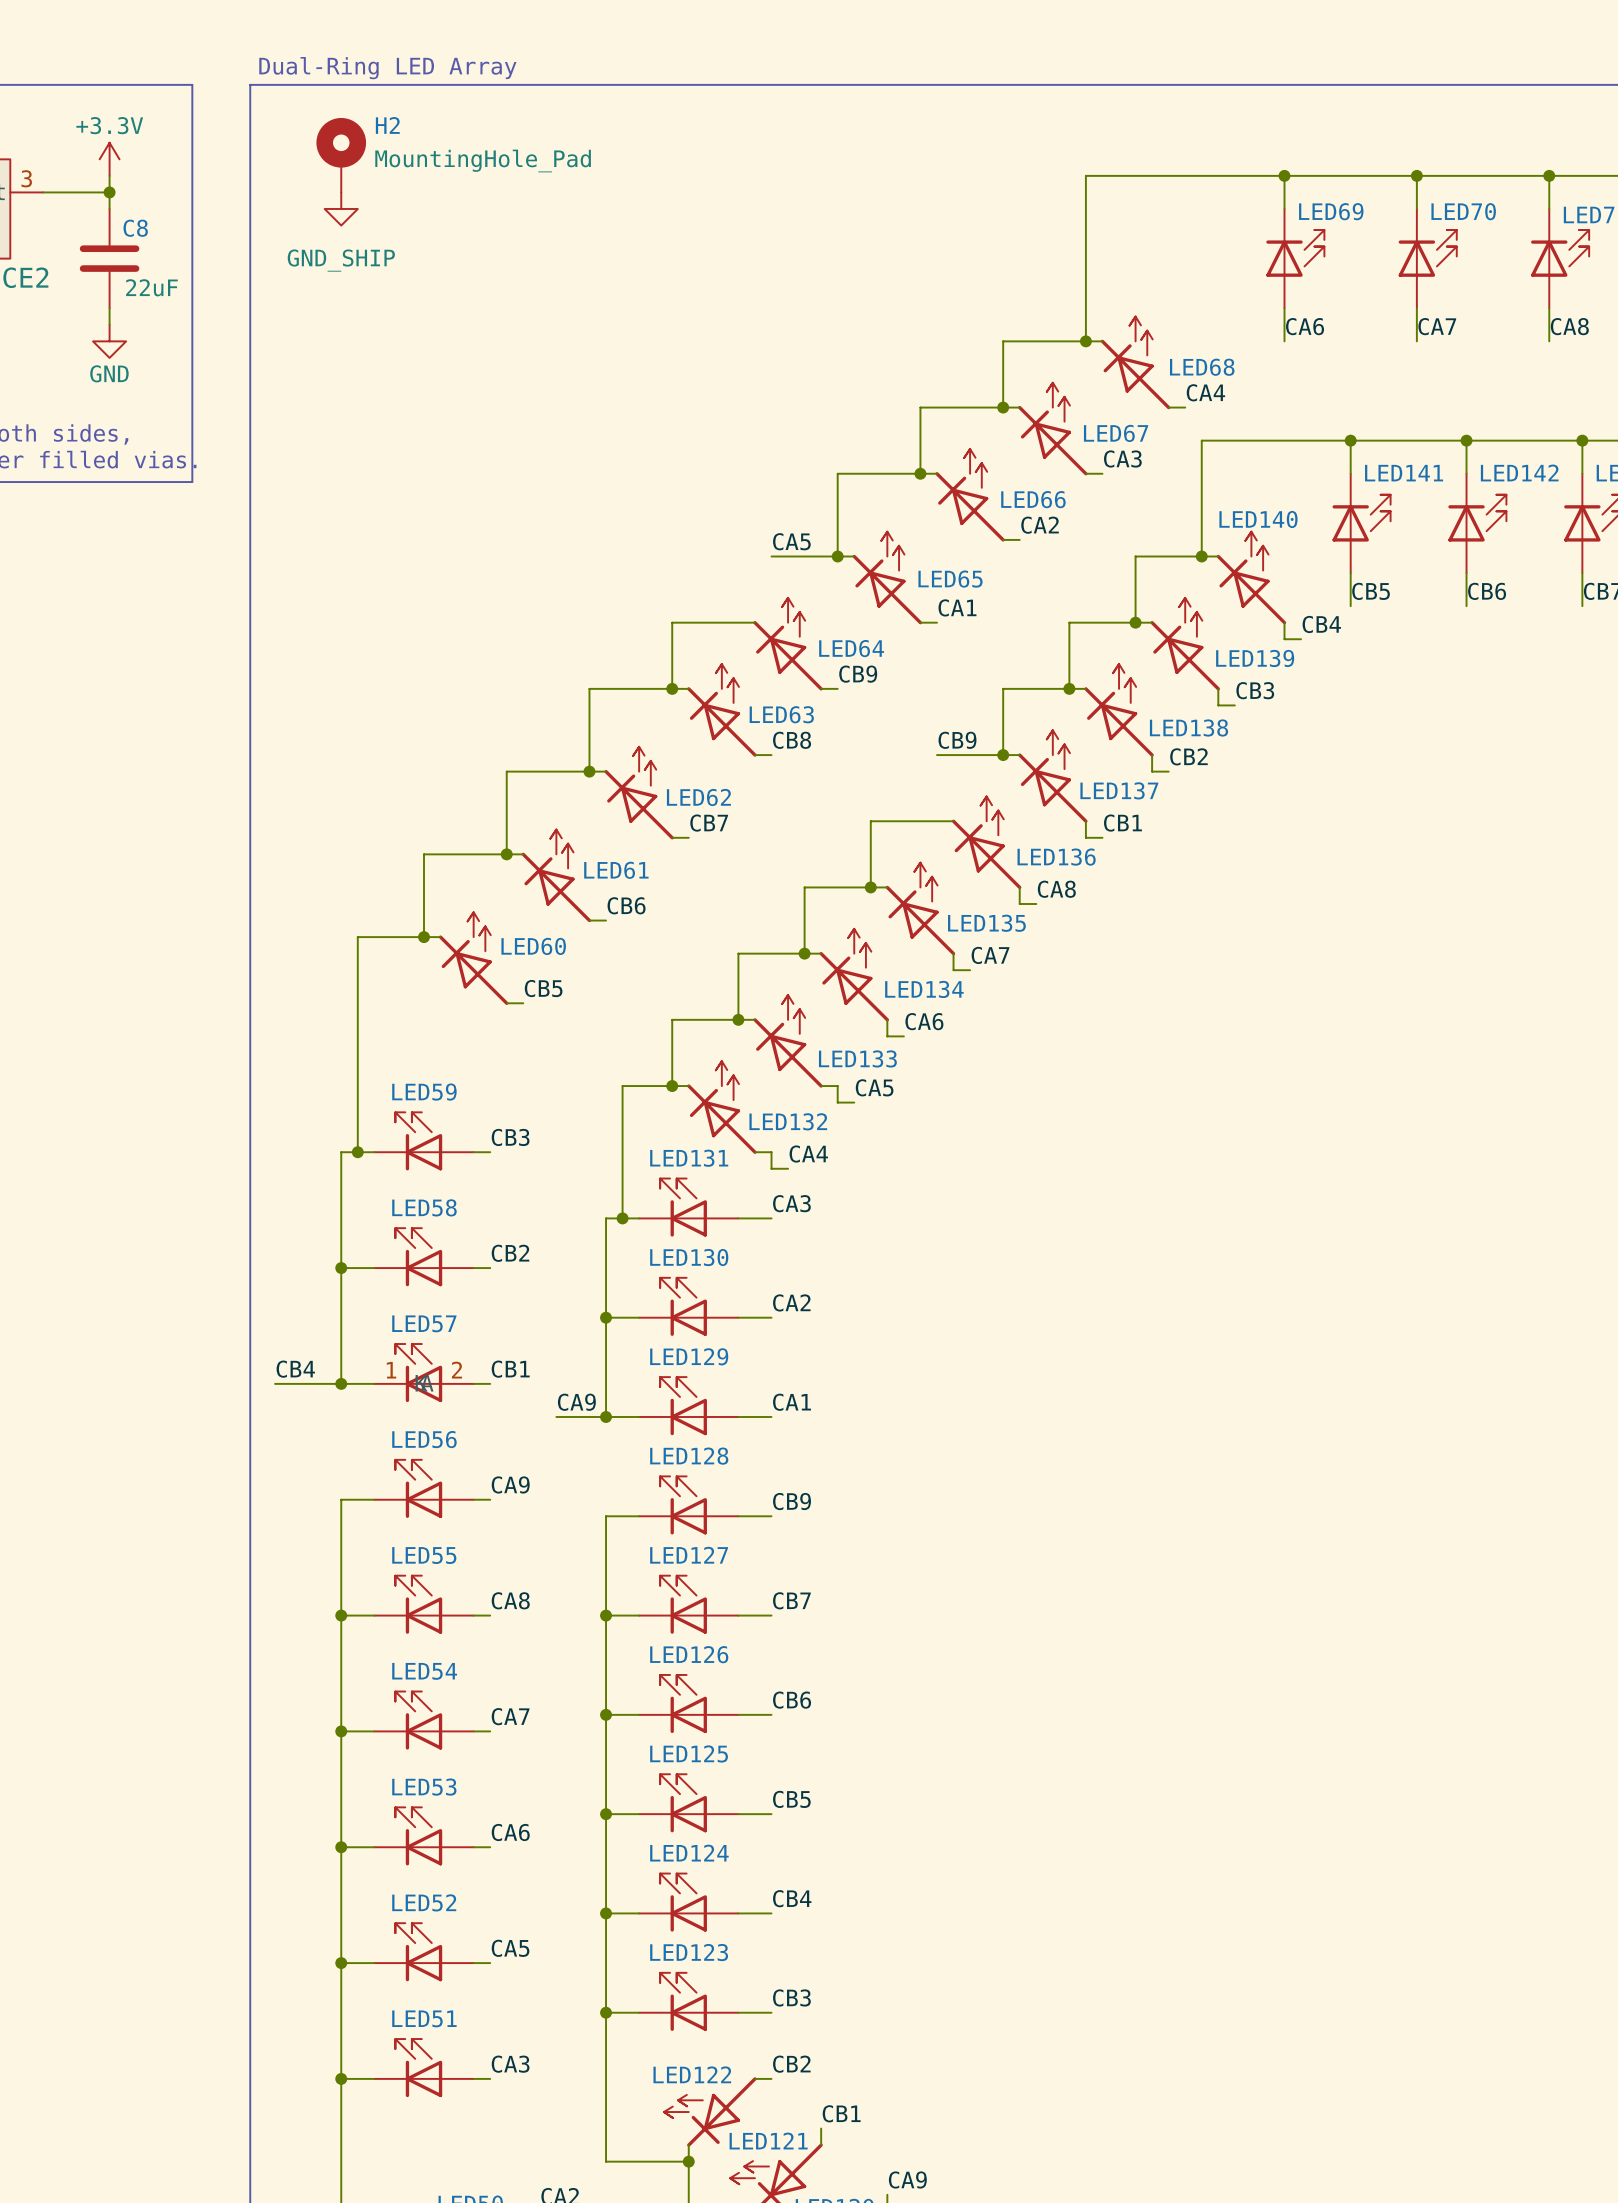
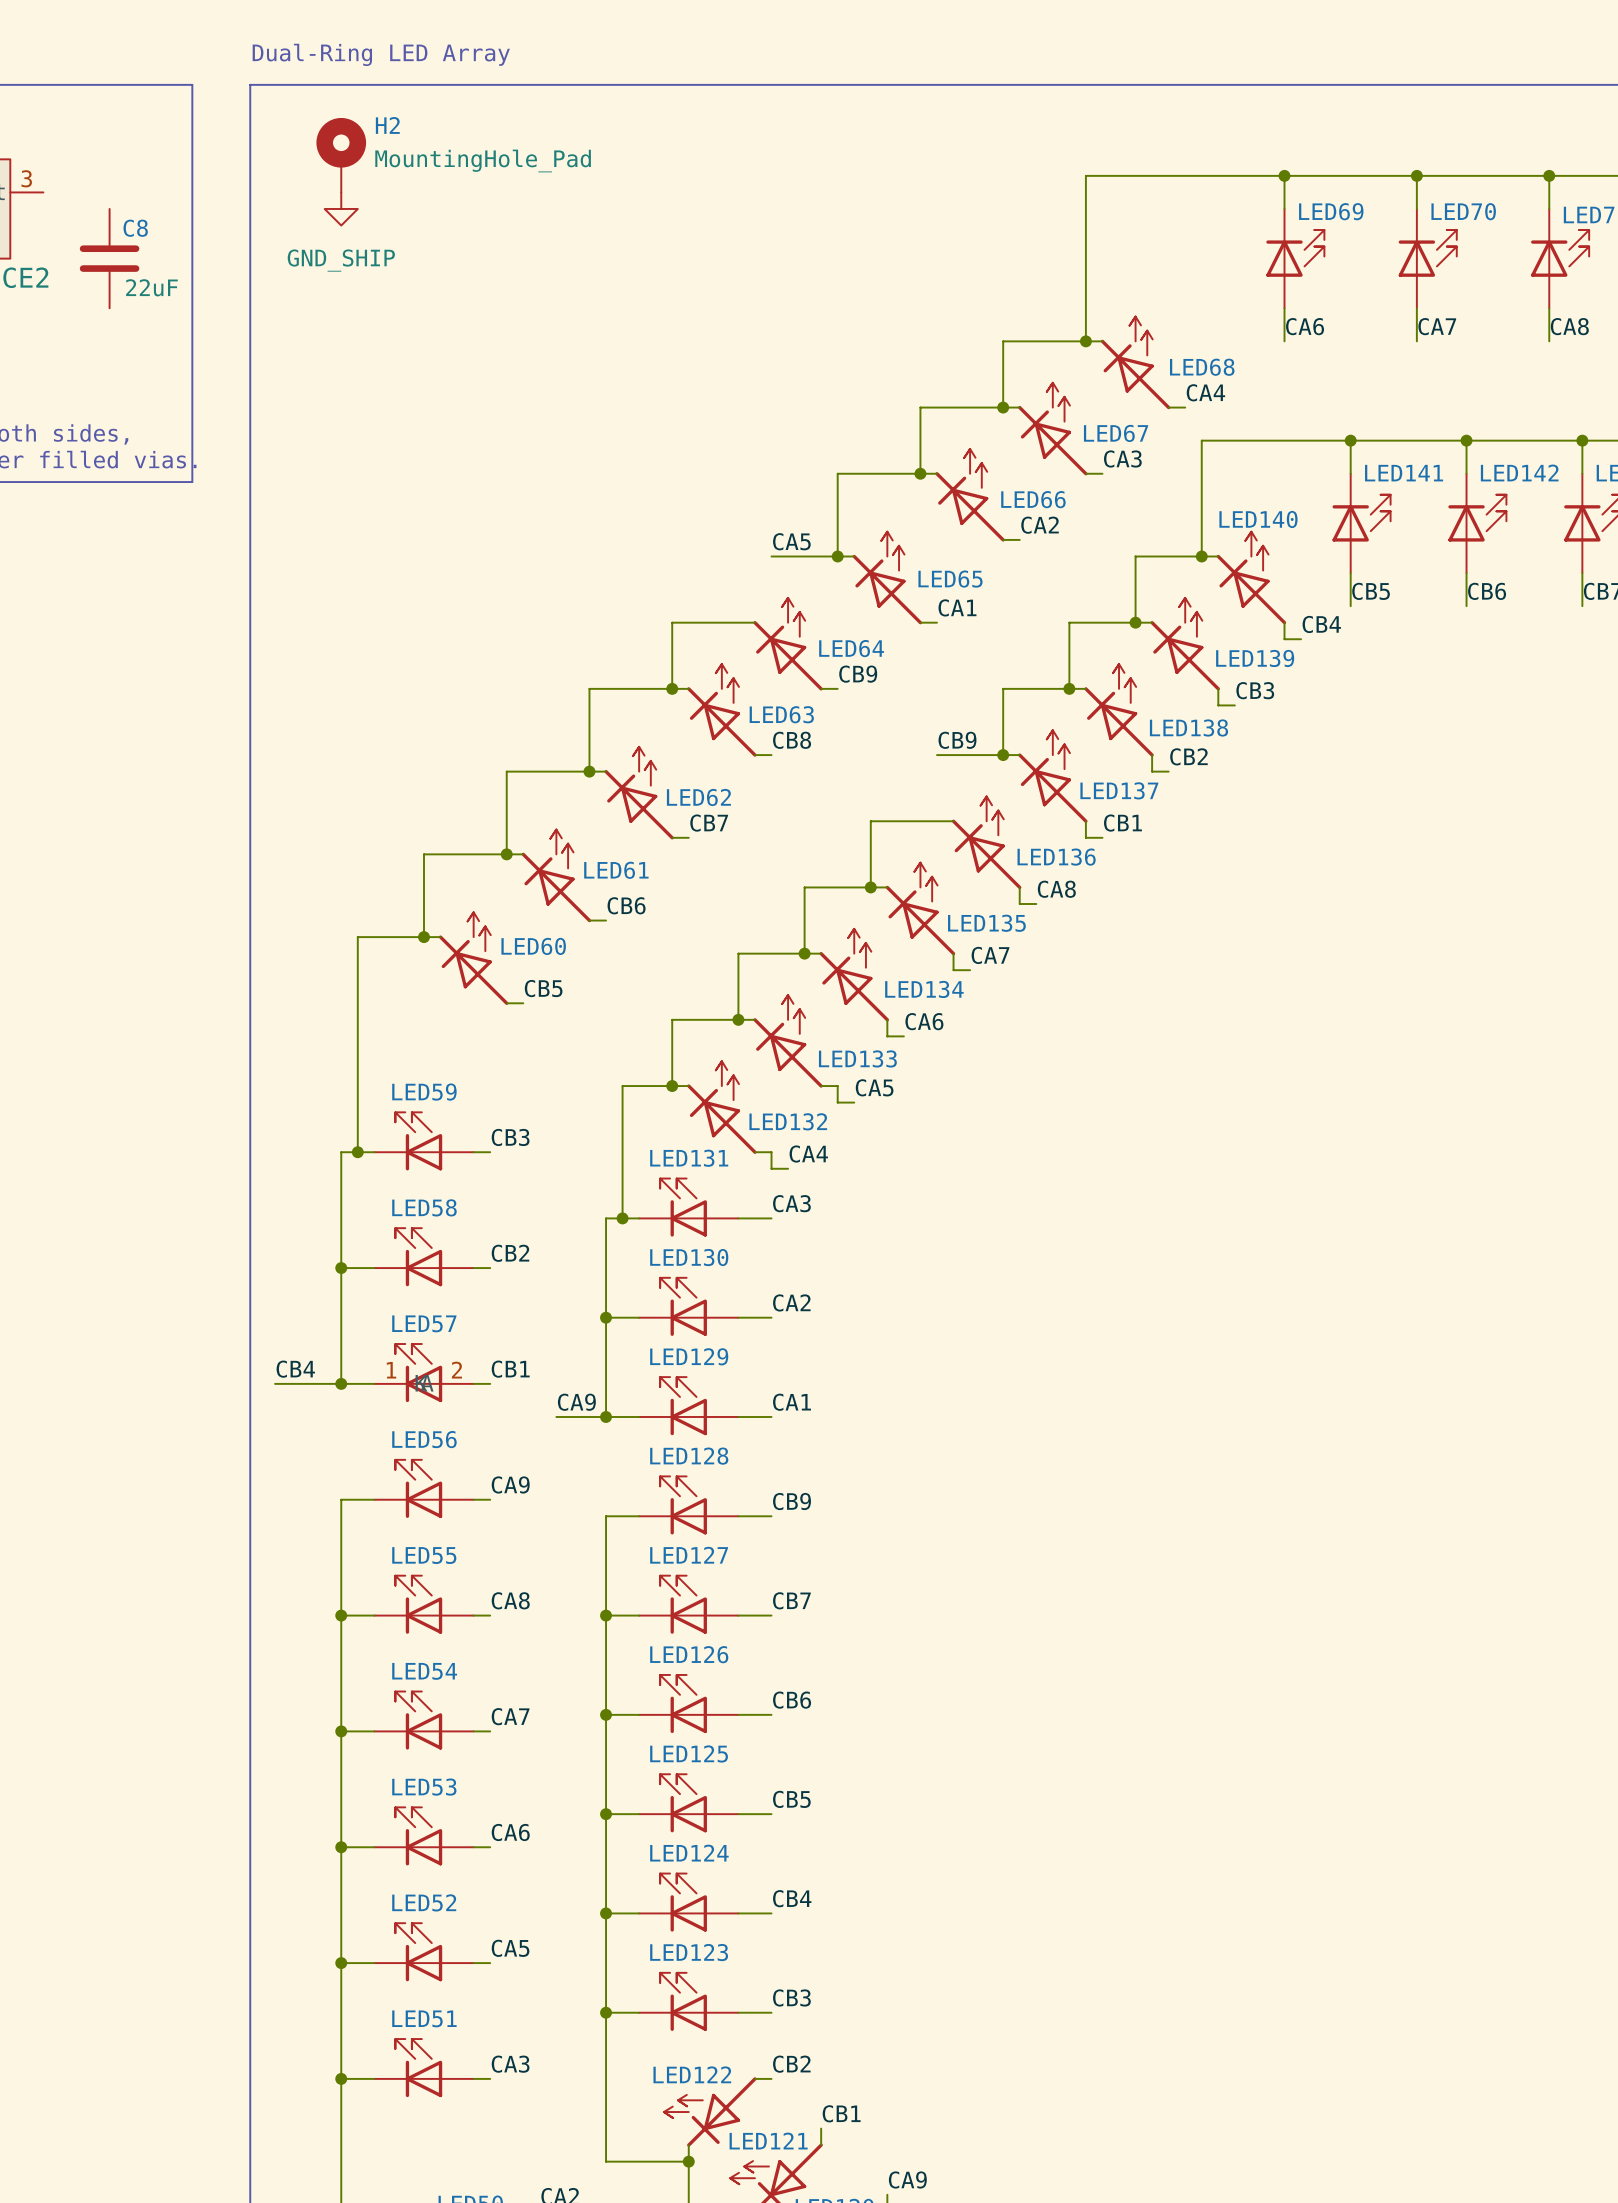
text position: Dual-Ring LED Array (387, 68) -> Dual-Ring LED Array (381, 54)
power symbol: +3.3V (109, 159) -> none
wire: (109, 175) (109, 208) -> none
wire: (43, 192) (109, 192) -> none
junction: (109, 192) -> none
wire: (109, 308) (109, 324) -> none
power symbol: GND (109, 341) -> none

